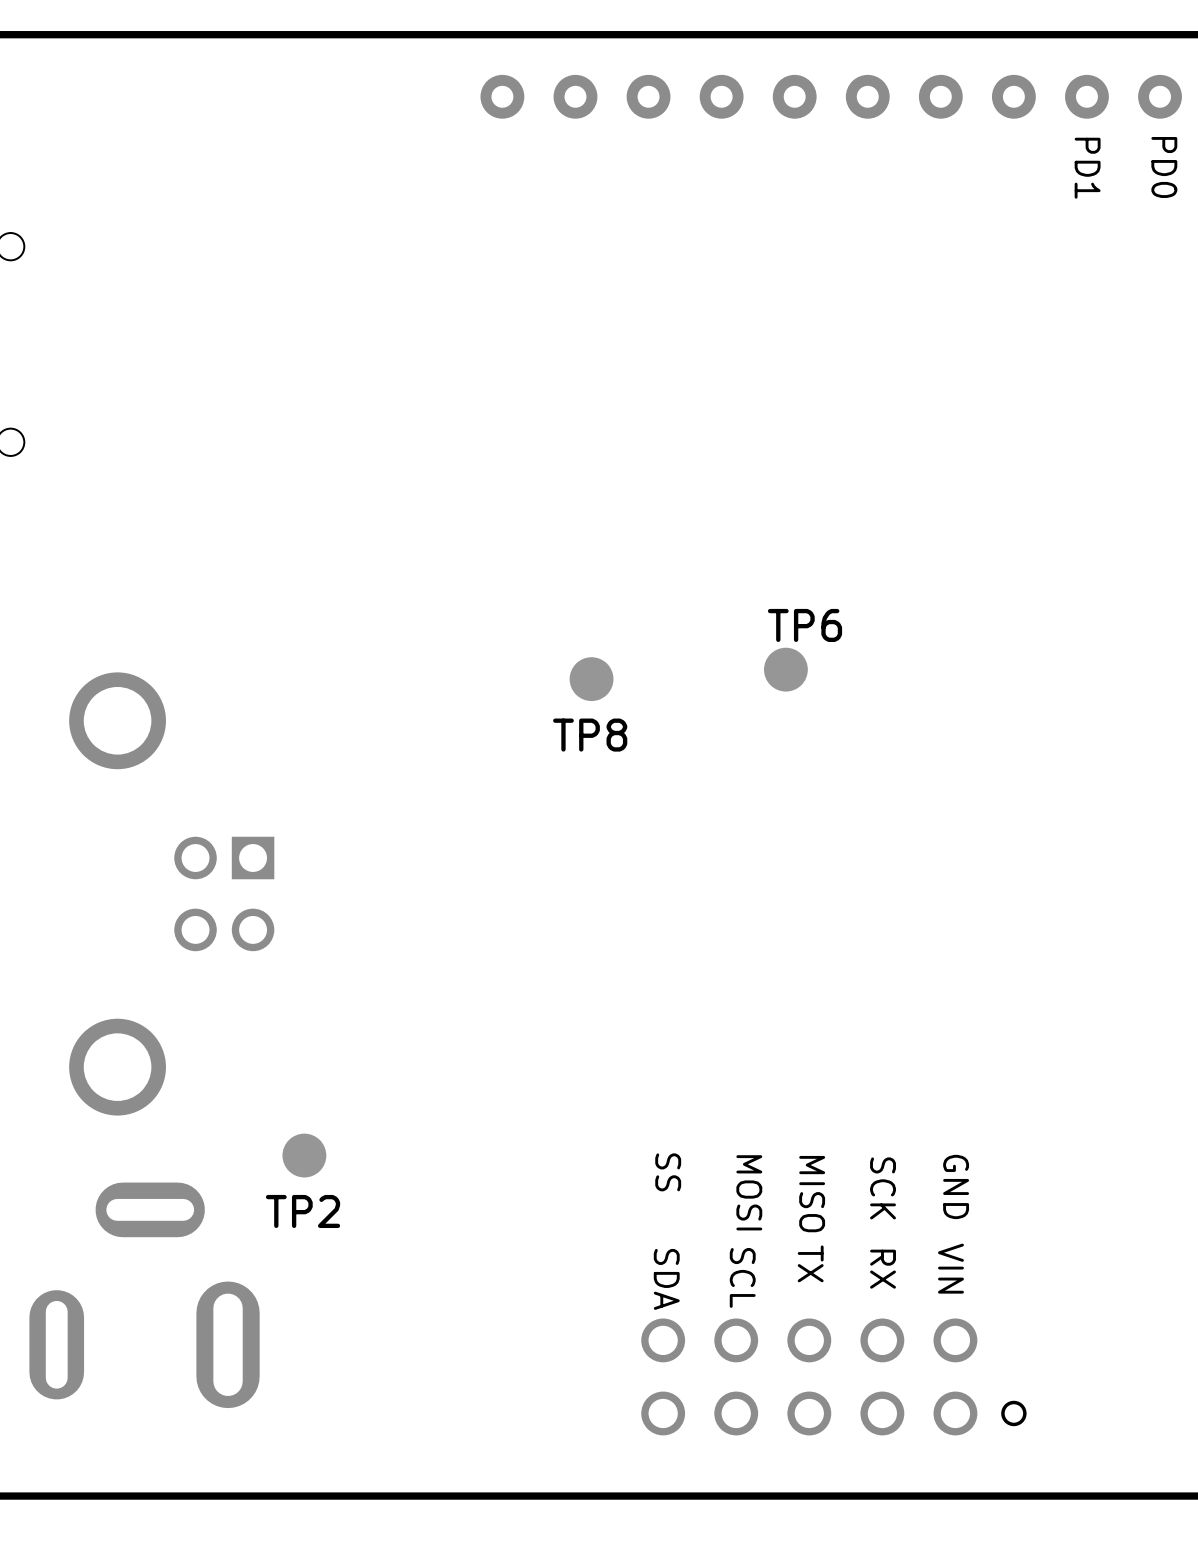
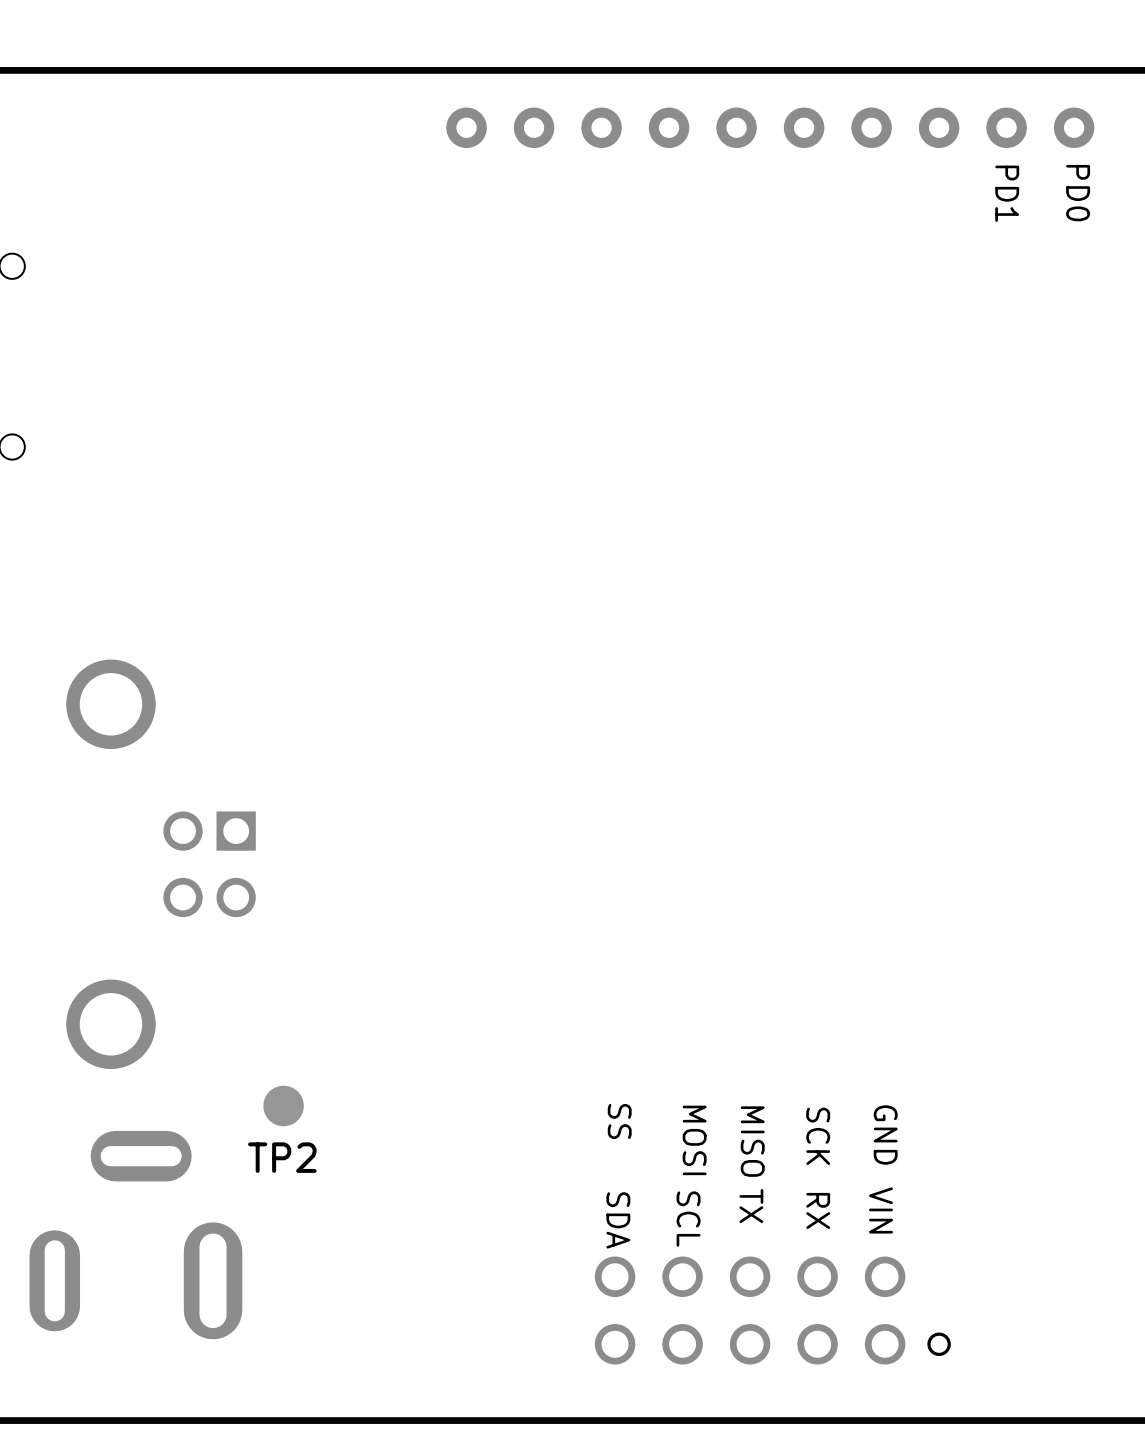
TP6: (785, 669) -> none
TP8: (591, 679) -> none

